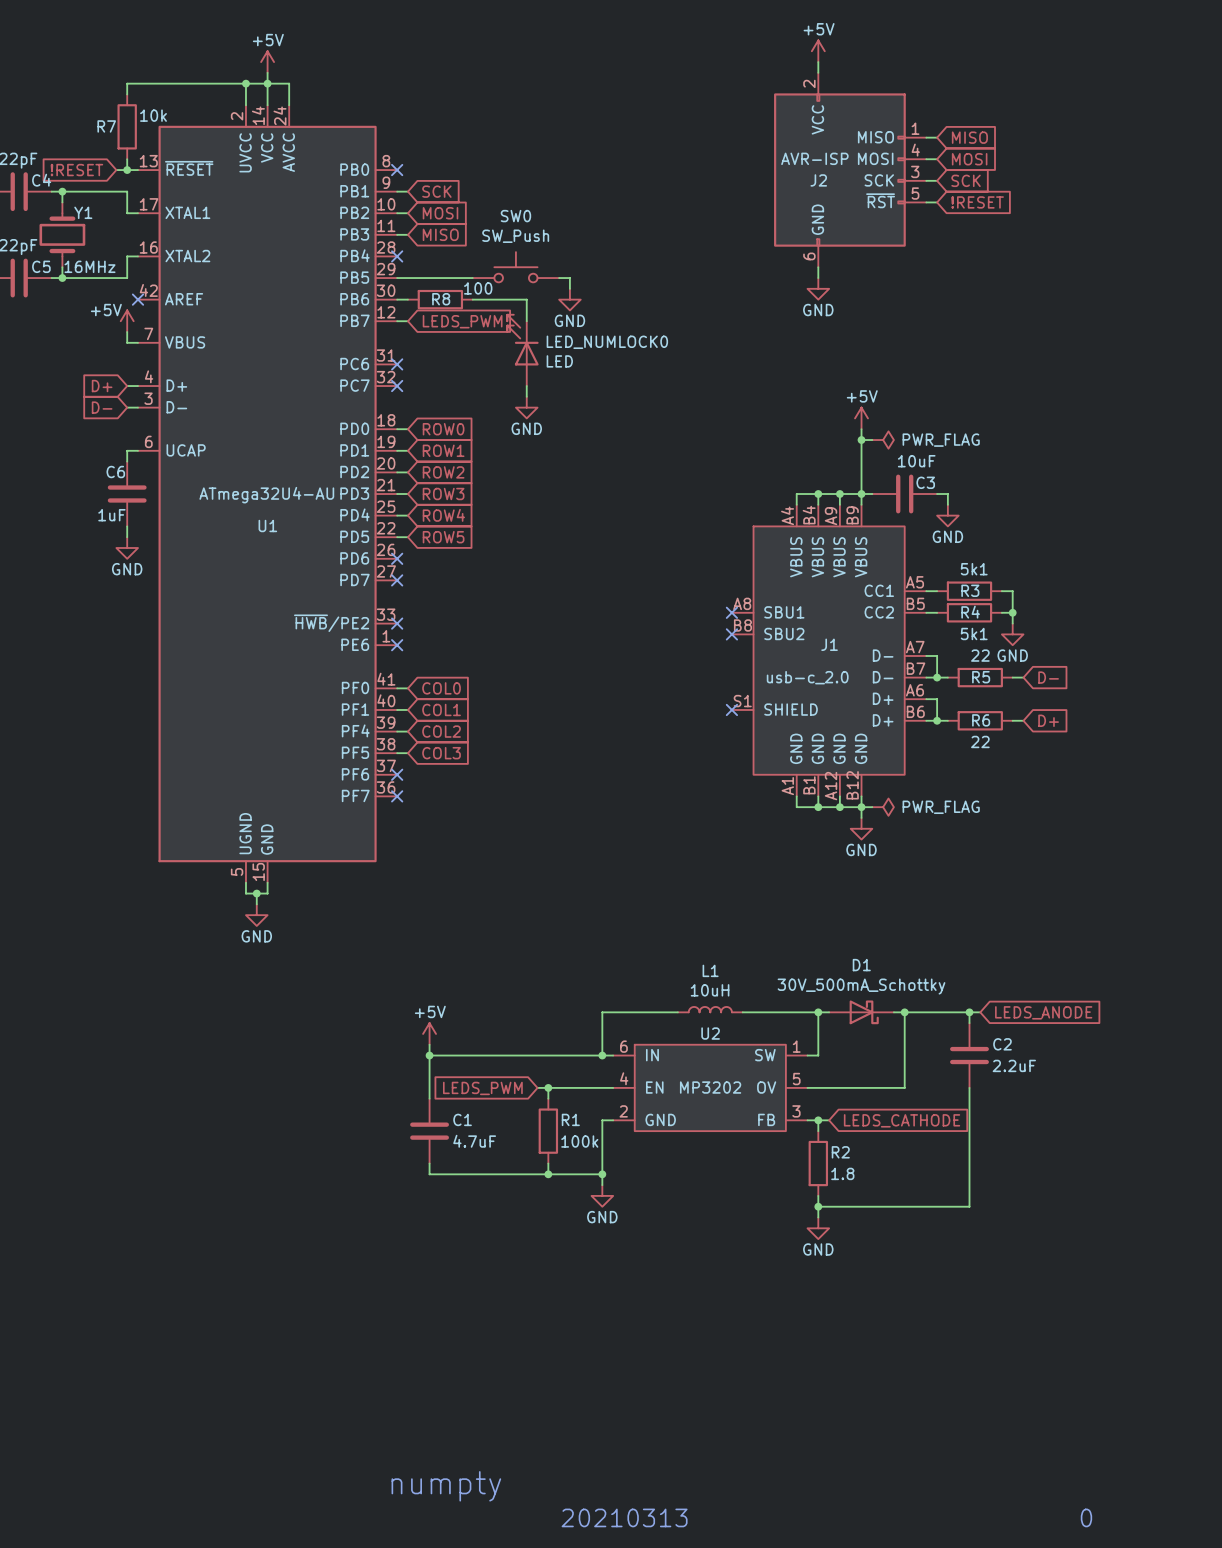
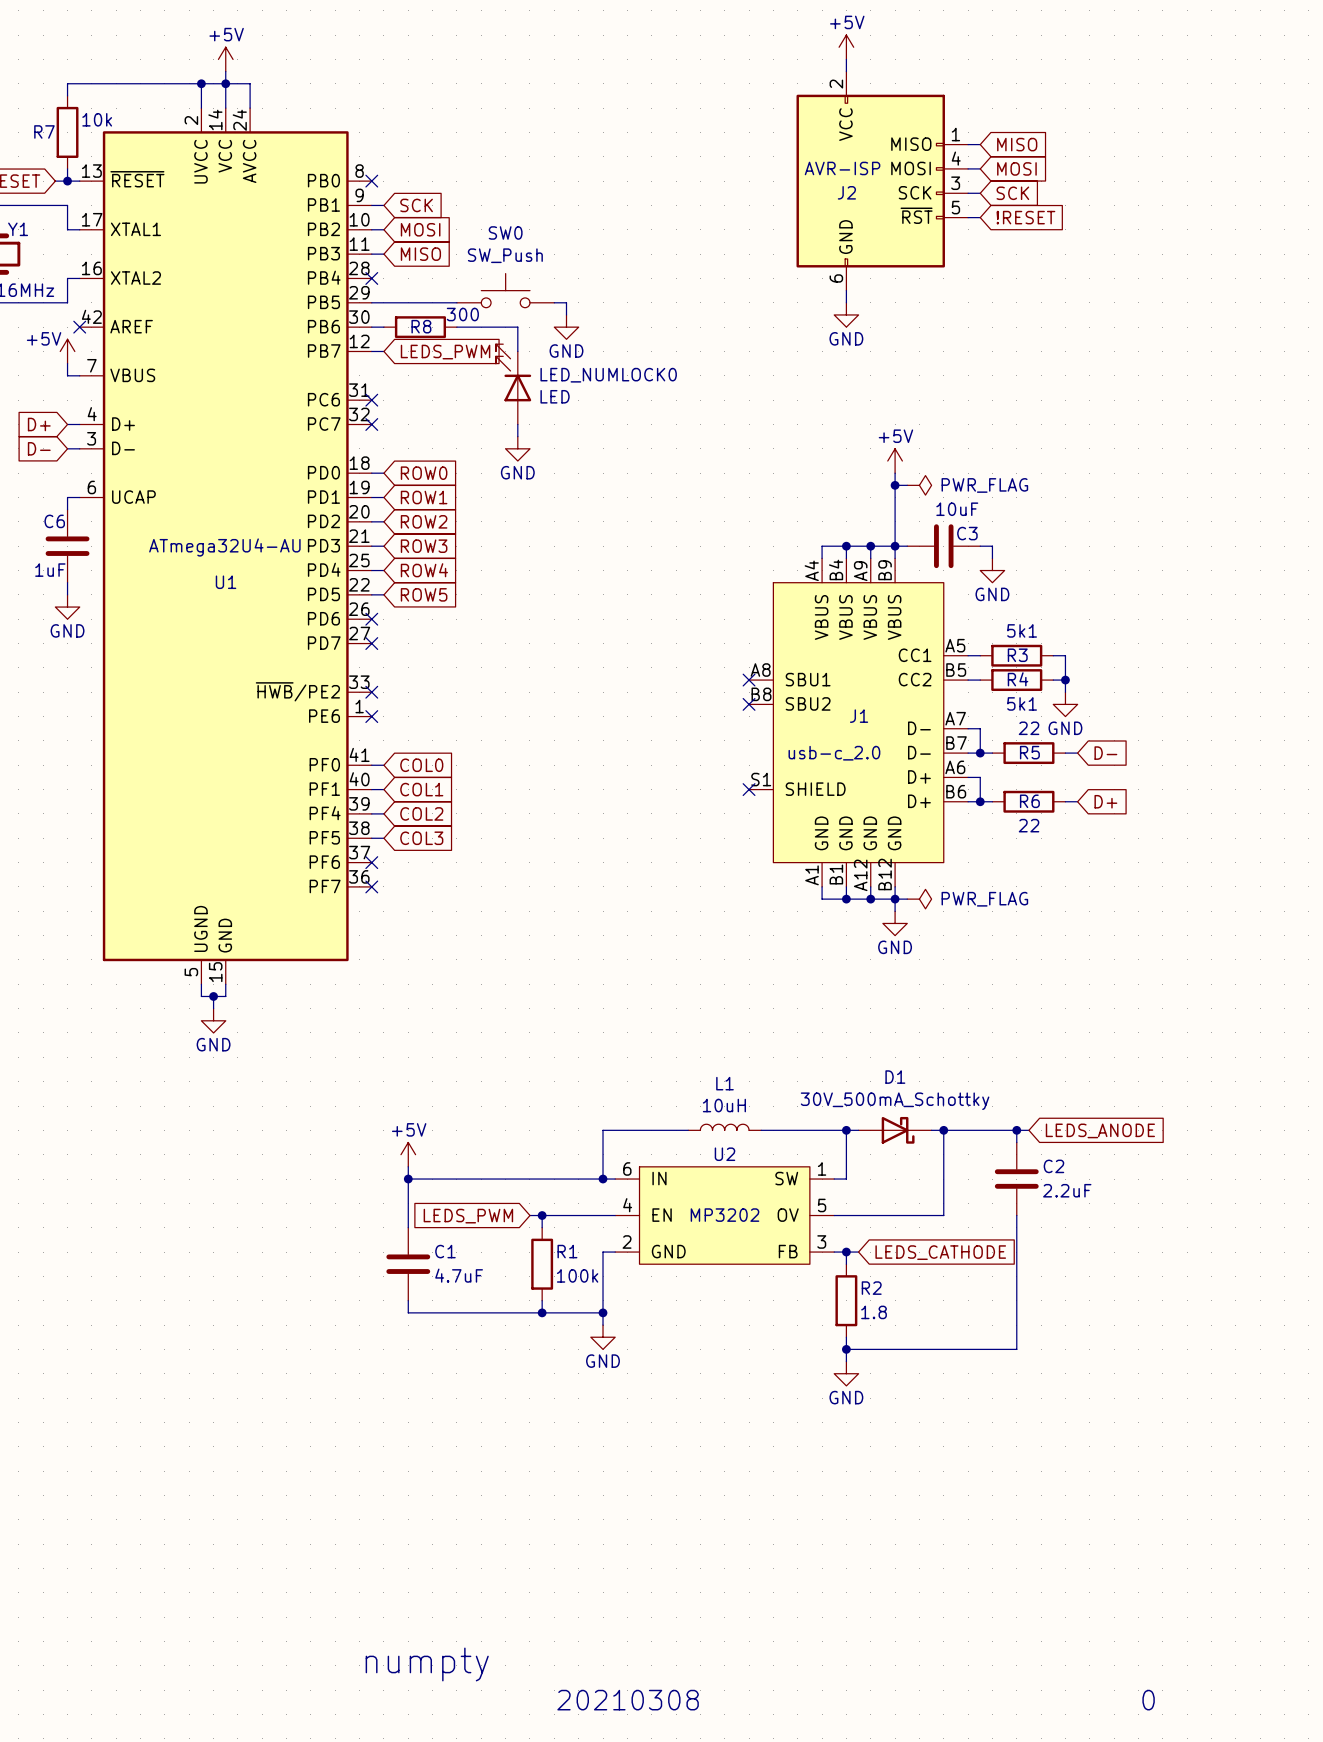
R8 value: 100 (478, 288) -> 300 (462, 314)
text: 20210313 (624, 1517) -> 20210308 (628, 1700)

